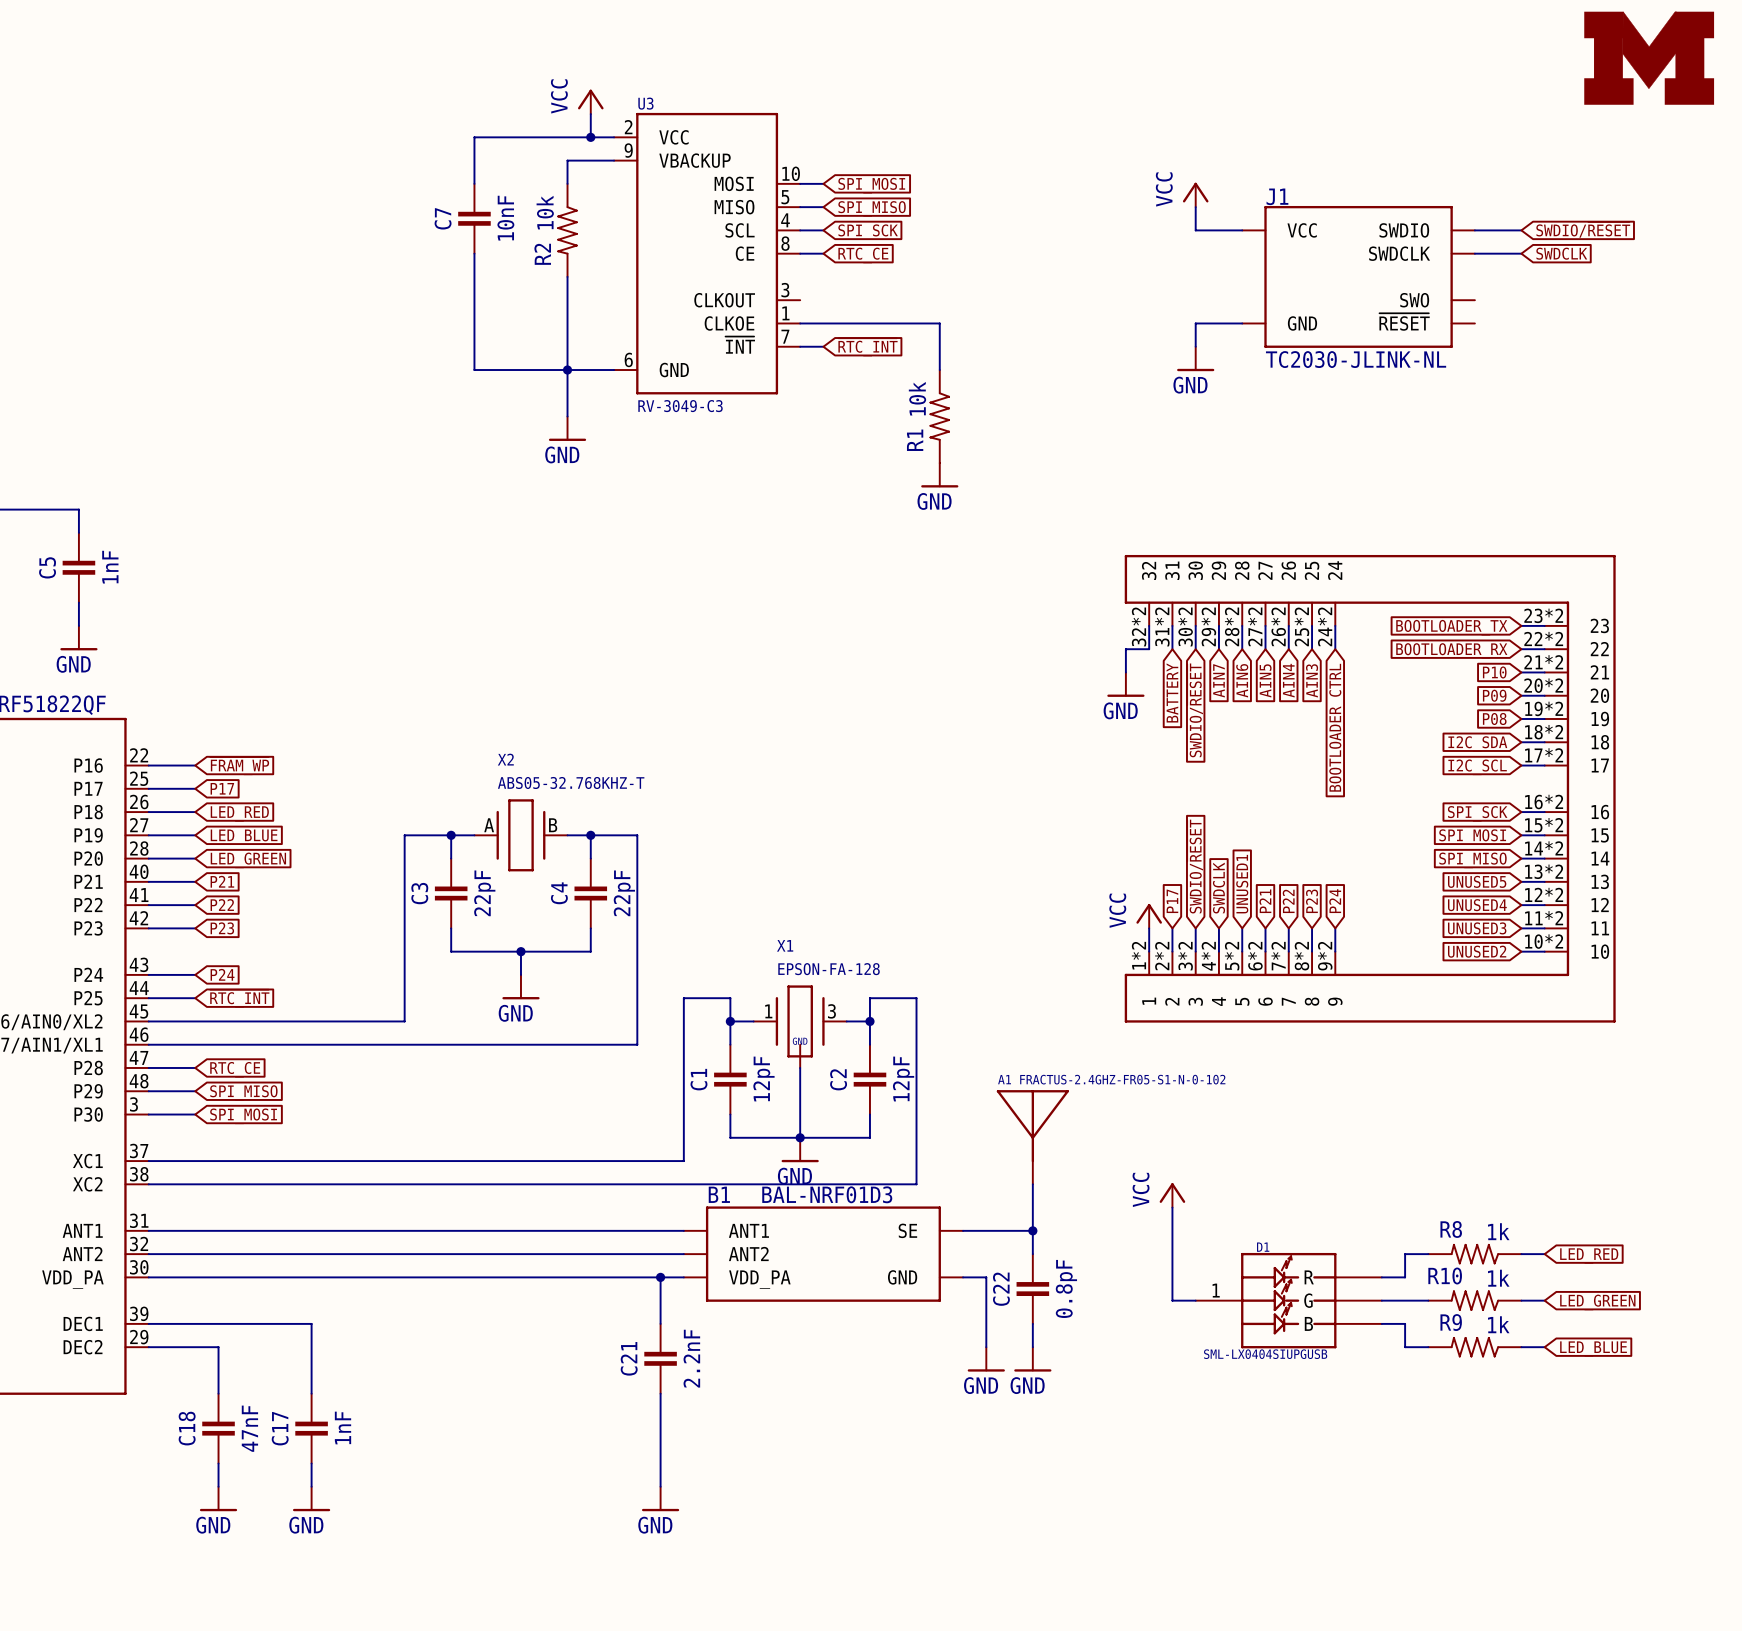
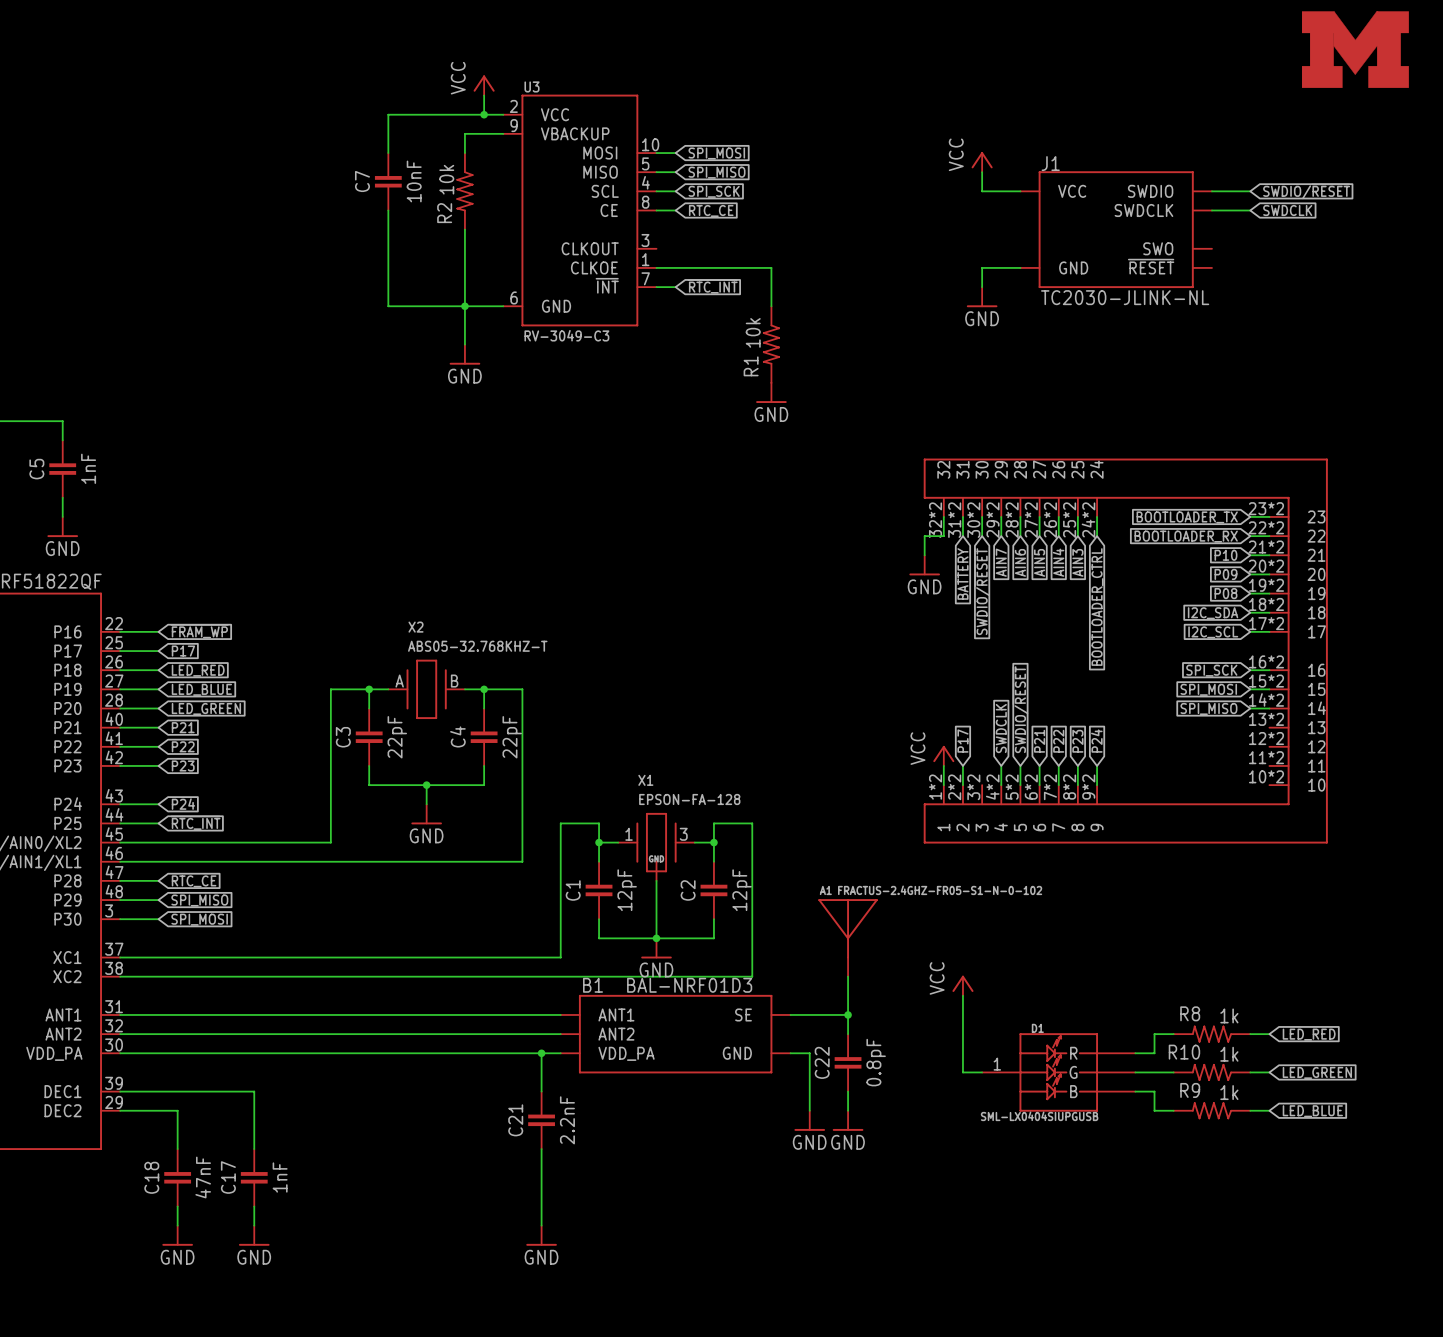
global label: SWDIO/~{RESET} (1195, 866) -> none
global label: UNUSED5 (1477, 881) -> none
wire: (1521, 881) (1544, 881) -> none
global label: UNUSED1 (1242, 884) -> SWDIO/~{RESET} (1020, 709)
global label: UNUSED4 (1477, 905) -> none
wire: (1521, 905) (1544, 905) -> none
wire: (1195, 928) (1195, 951) -> none
global label: UNUSED3 (1477, 928) -> none
wire: (1521, 928) (1544, 928) -> none
global label: UNUSED2 (1477, 951) -> none
wire: (1521, 951) (1544, 951) -> none

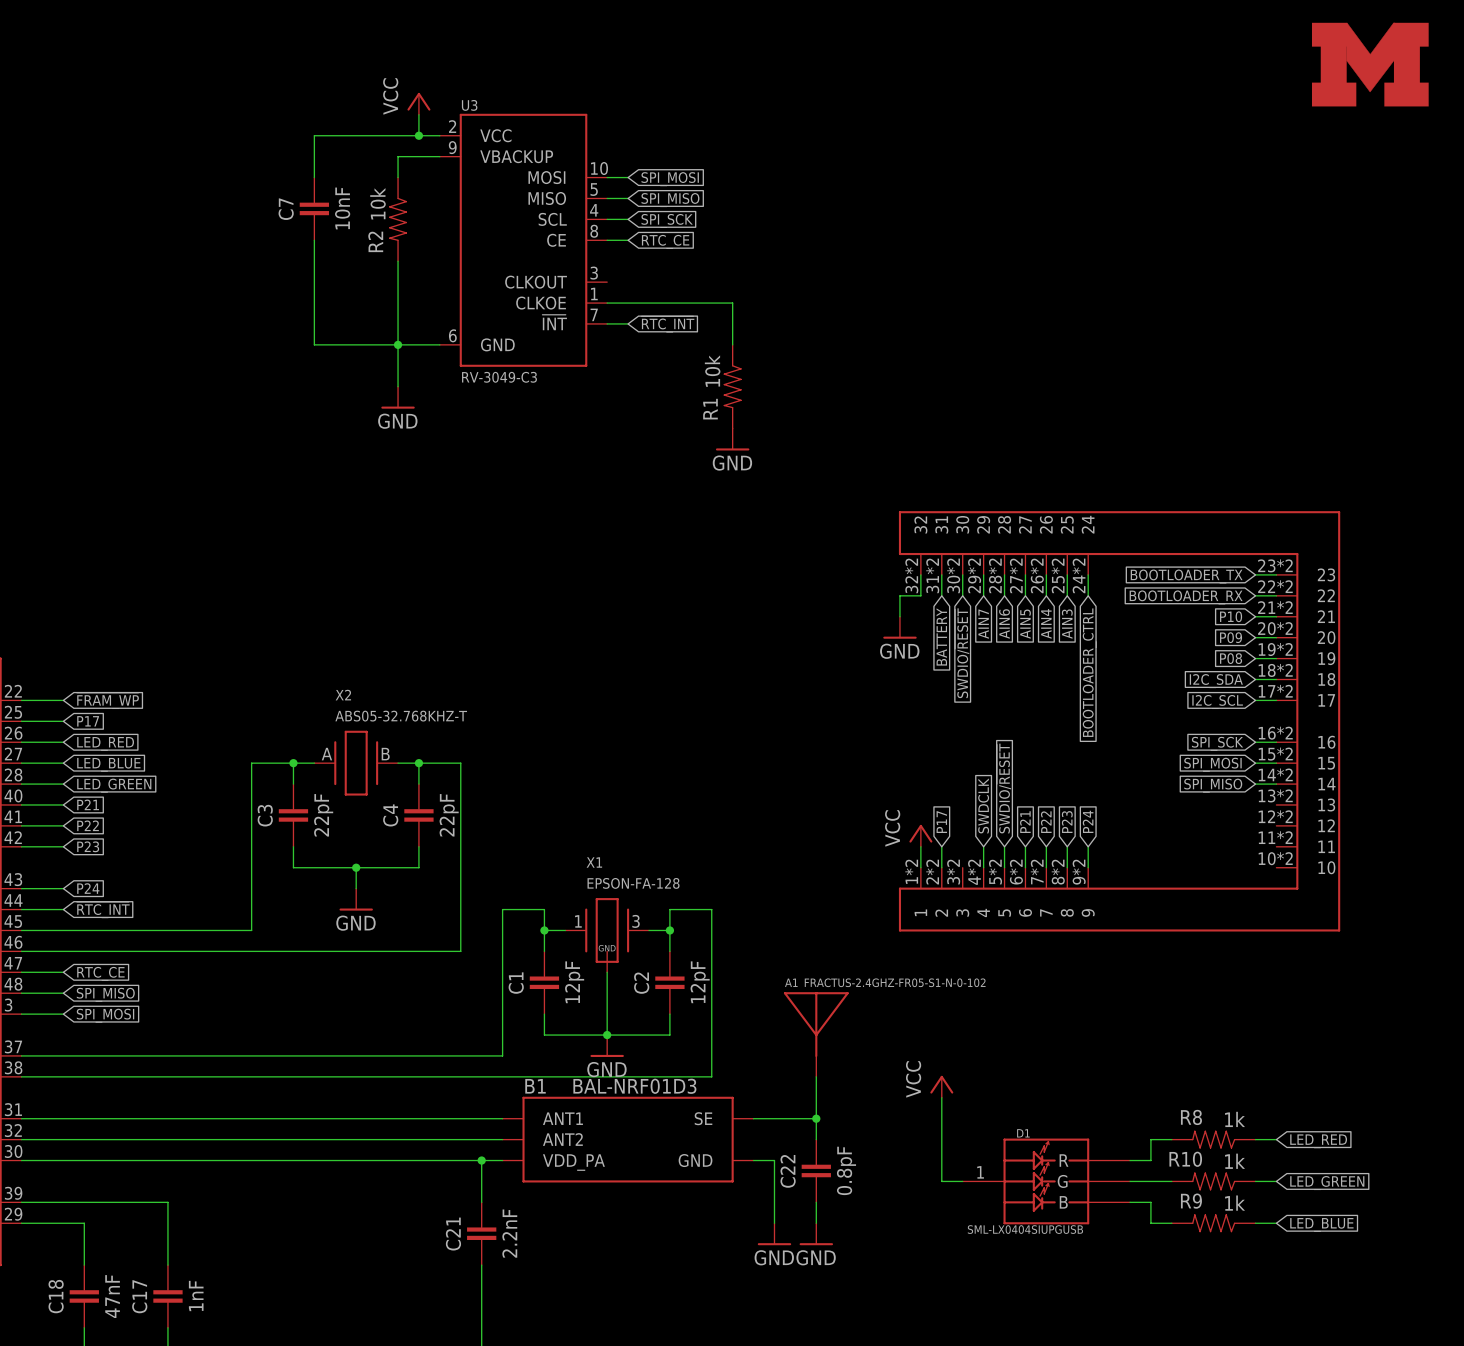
power symbol: VCC (982, 162) -> none
wire: (982, 172) (982, 191) (1020, 191) -> none
wire: (1211, 191) (1250, 191) -> none
global label: SWDIO/~{RESET} (1306, 191) -> none
wire: (1211, 210) (1250, 210) -> none
global label: SWDCLK (1287, 210) -> none
J1: TC2030-JLINK-NL (1116, 229) -> none
wire: (1020, 267) (982, 267) (982, 287) -> none
power symbol: GND (982, 297) -> none

